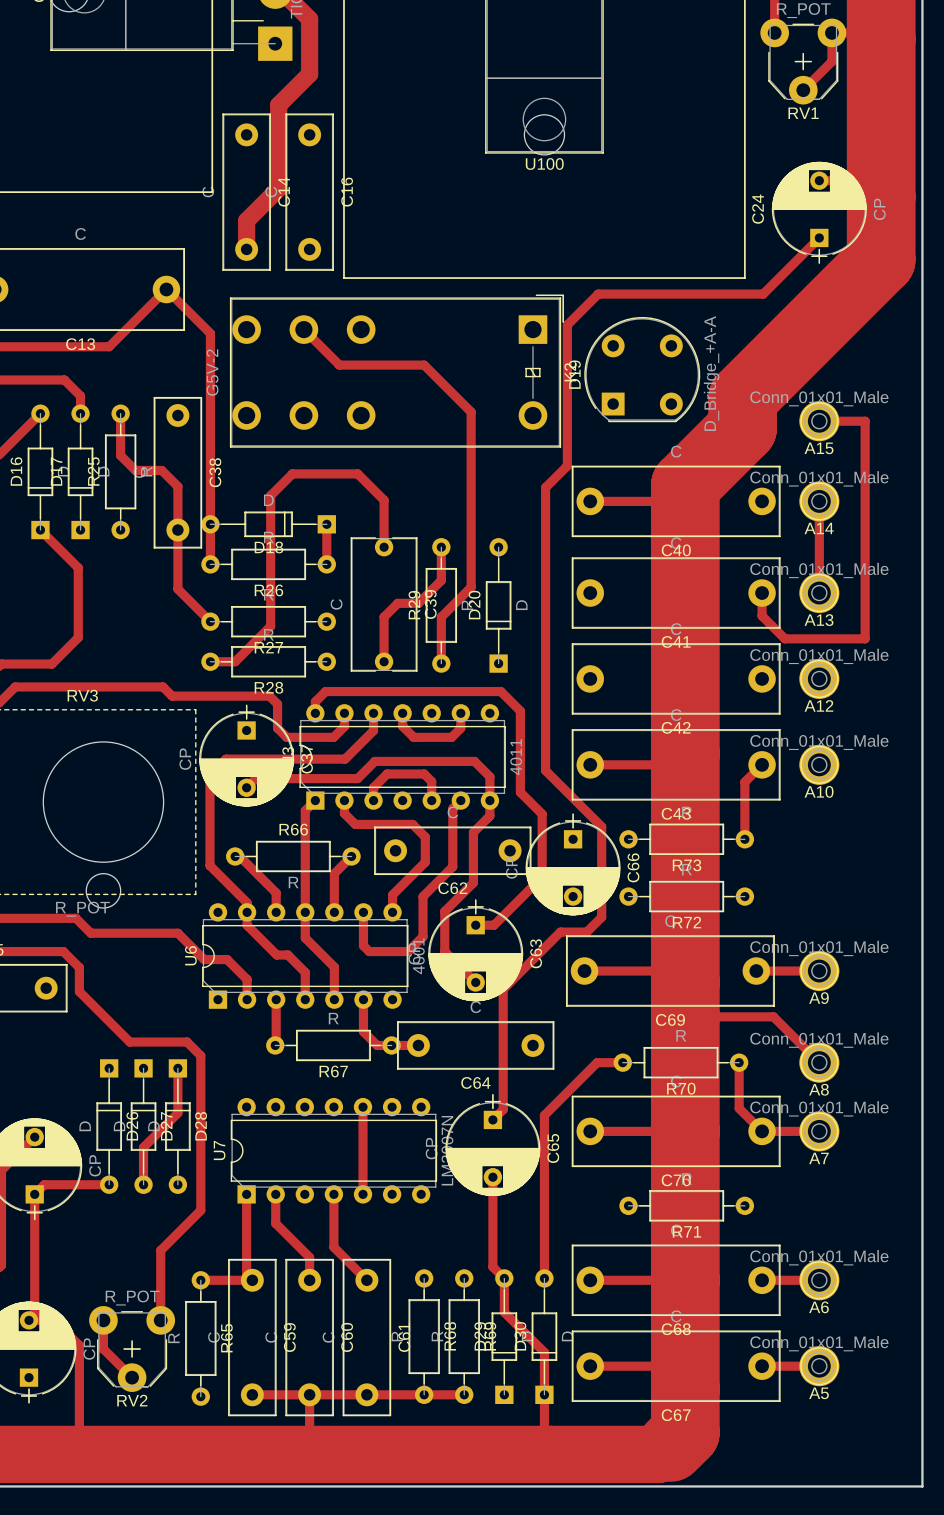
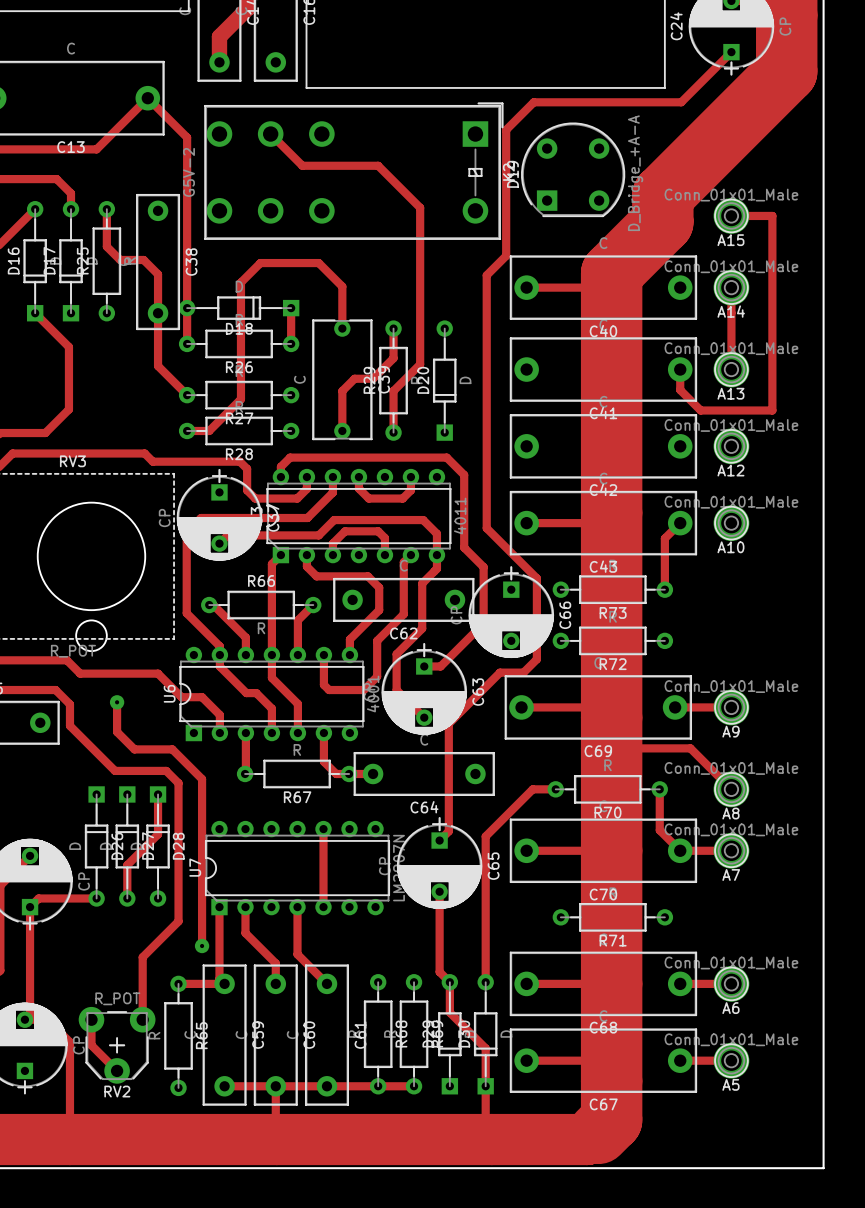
track: none -> (117, 702) (117, 732) (134, 749) (172, 749) (202, 779) (202, 946)
via: none -> (117, 702)
via: none -> (202, 946)

